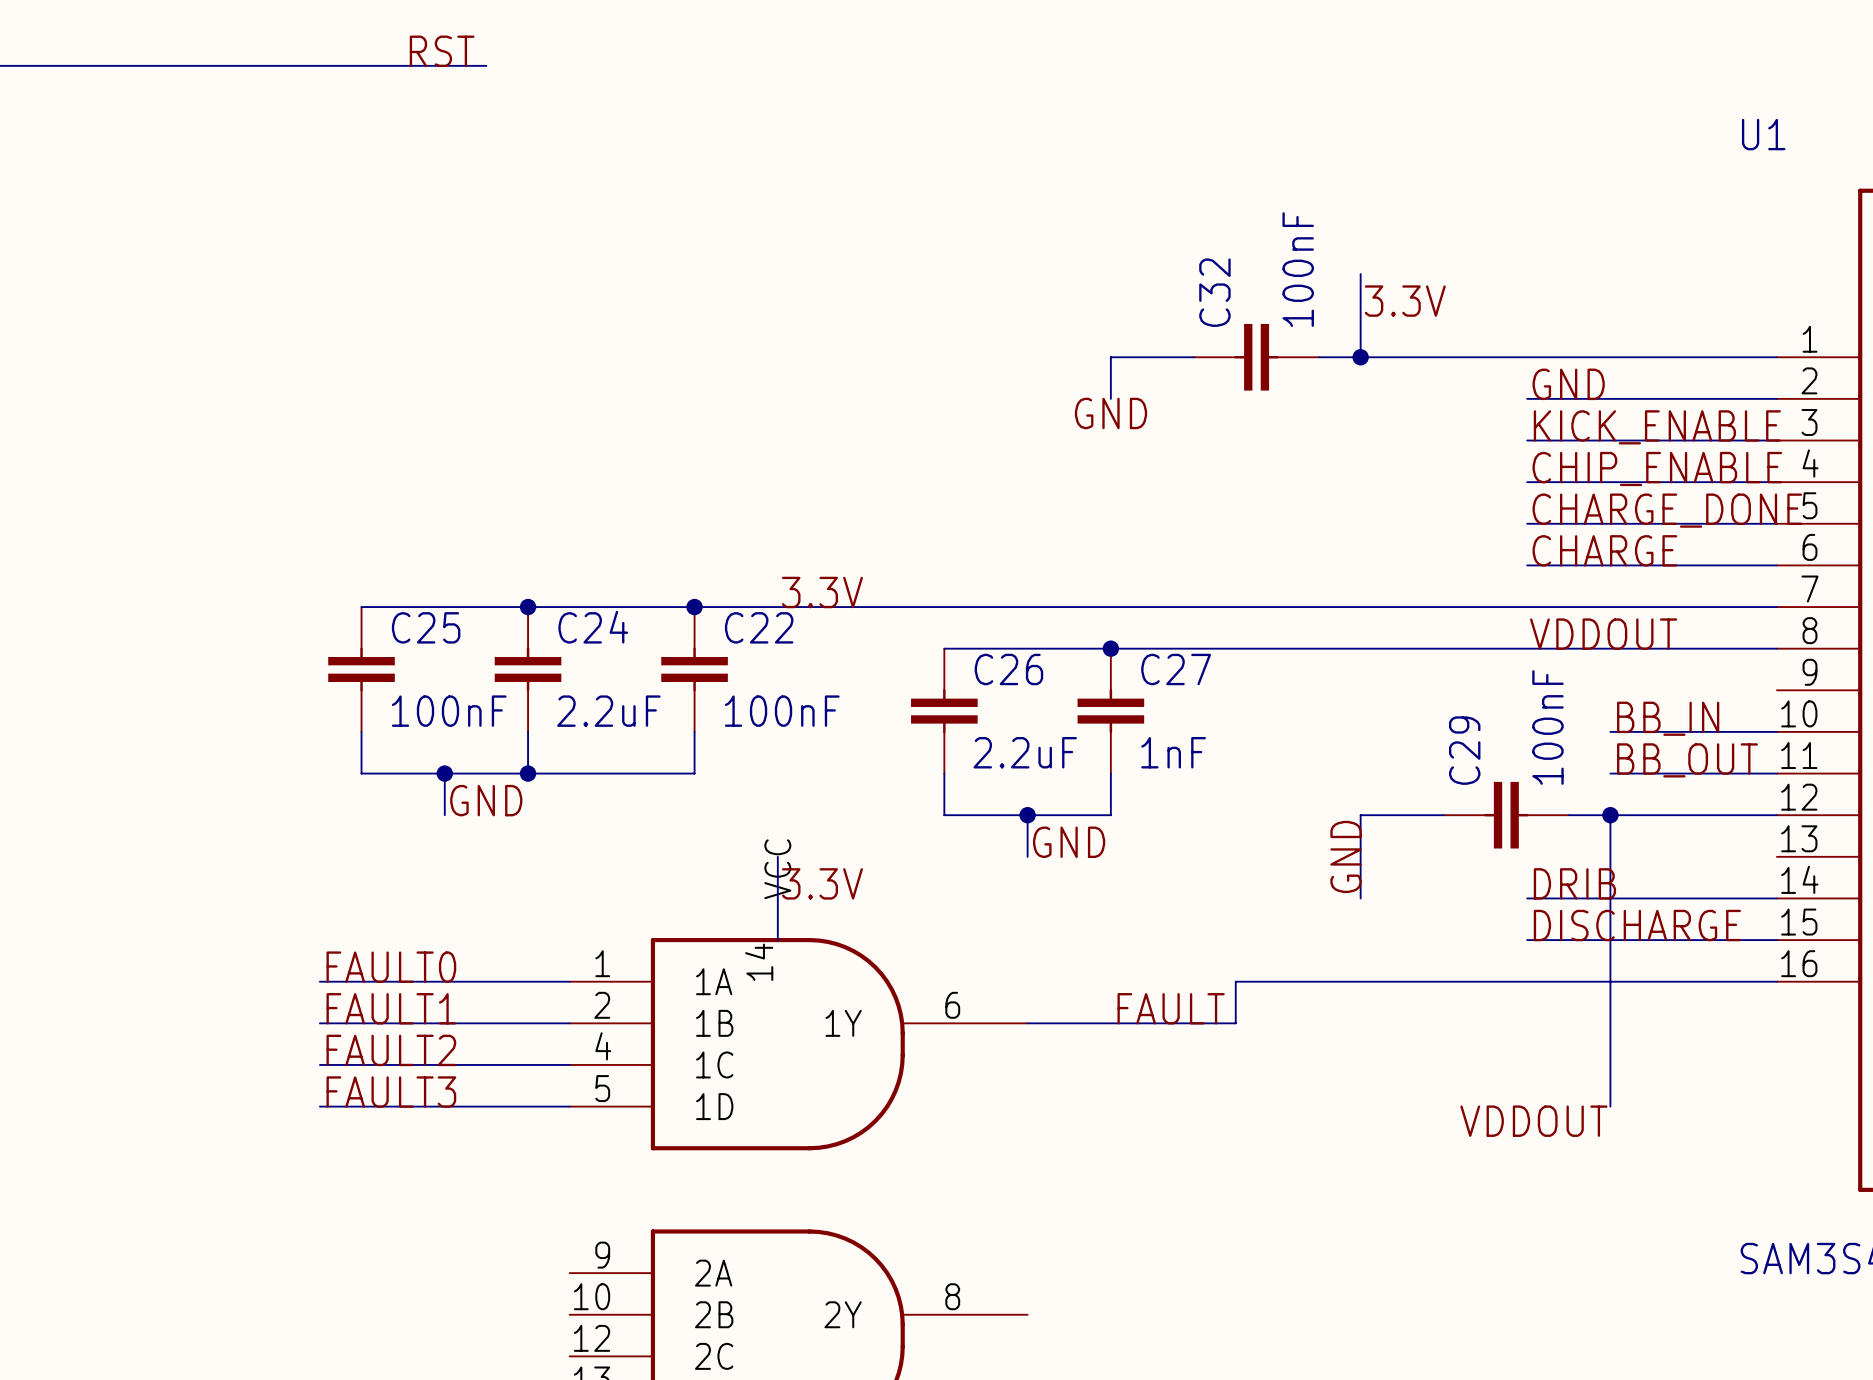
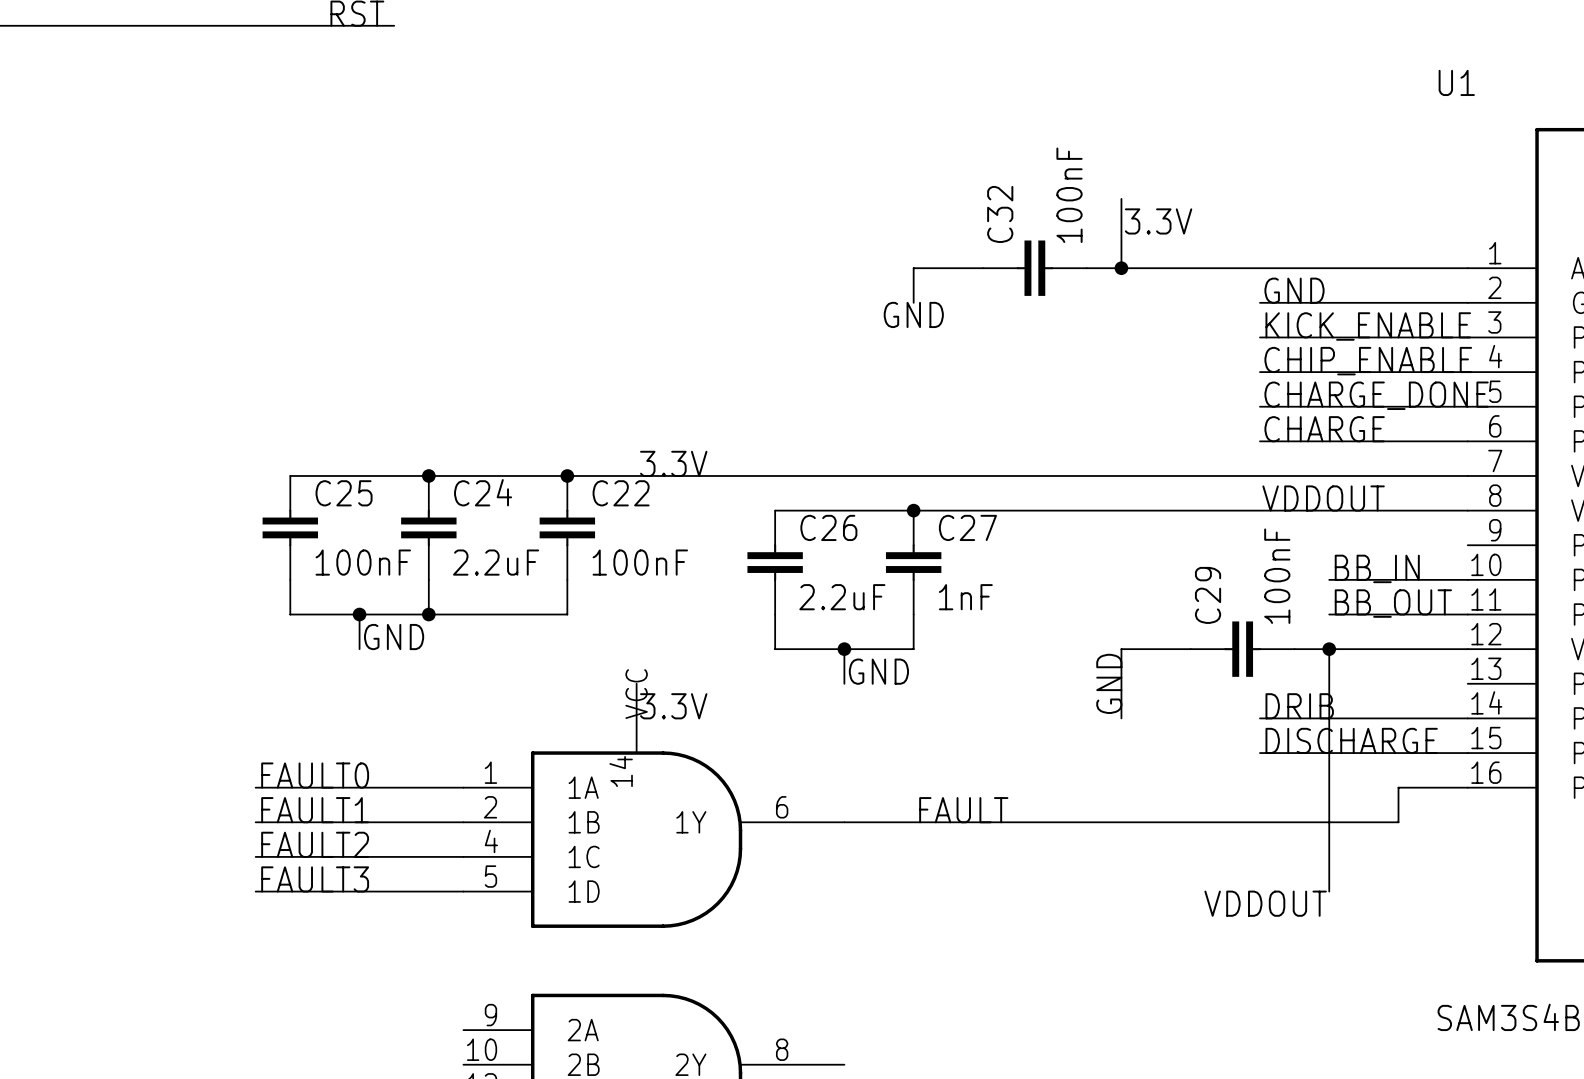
wire: (1693, 981) (1235, 981) (1235, 1023) -> (1398, 787) (1398, 822) (1017, 822)

